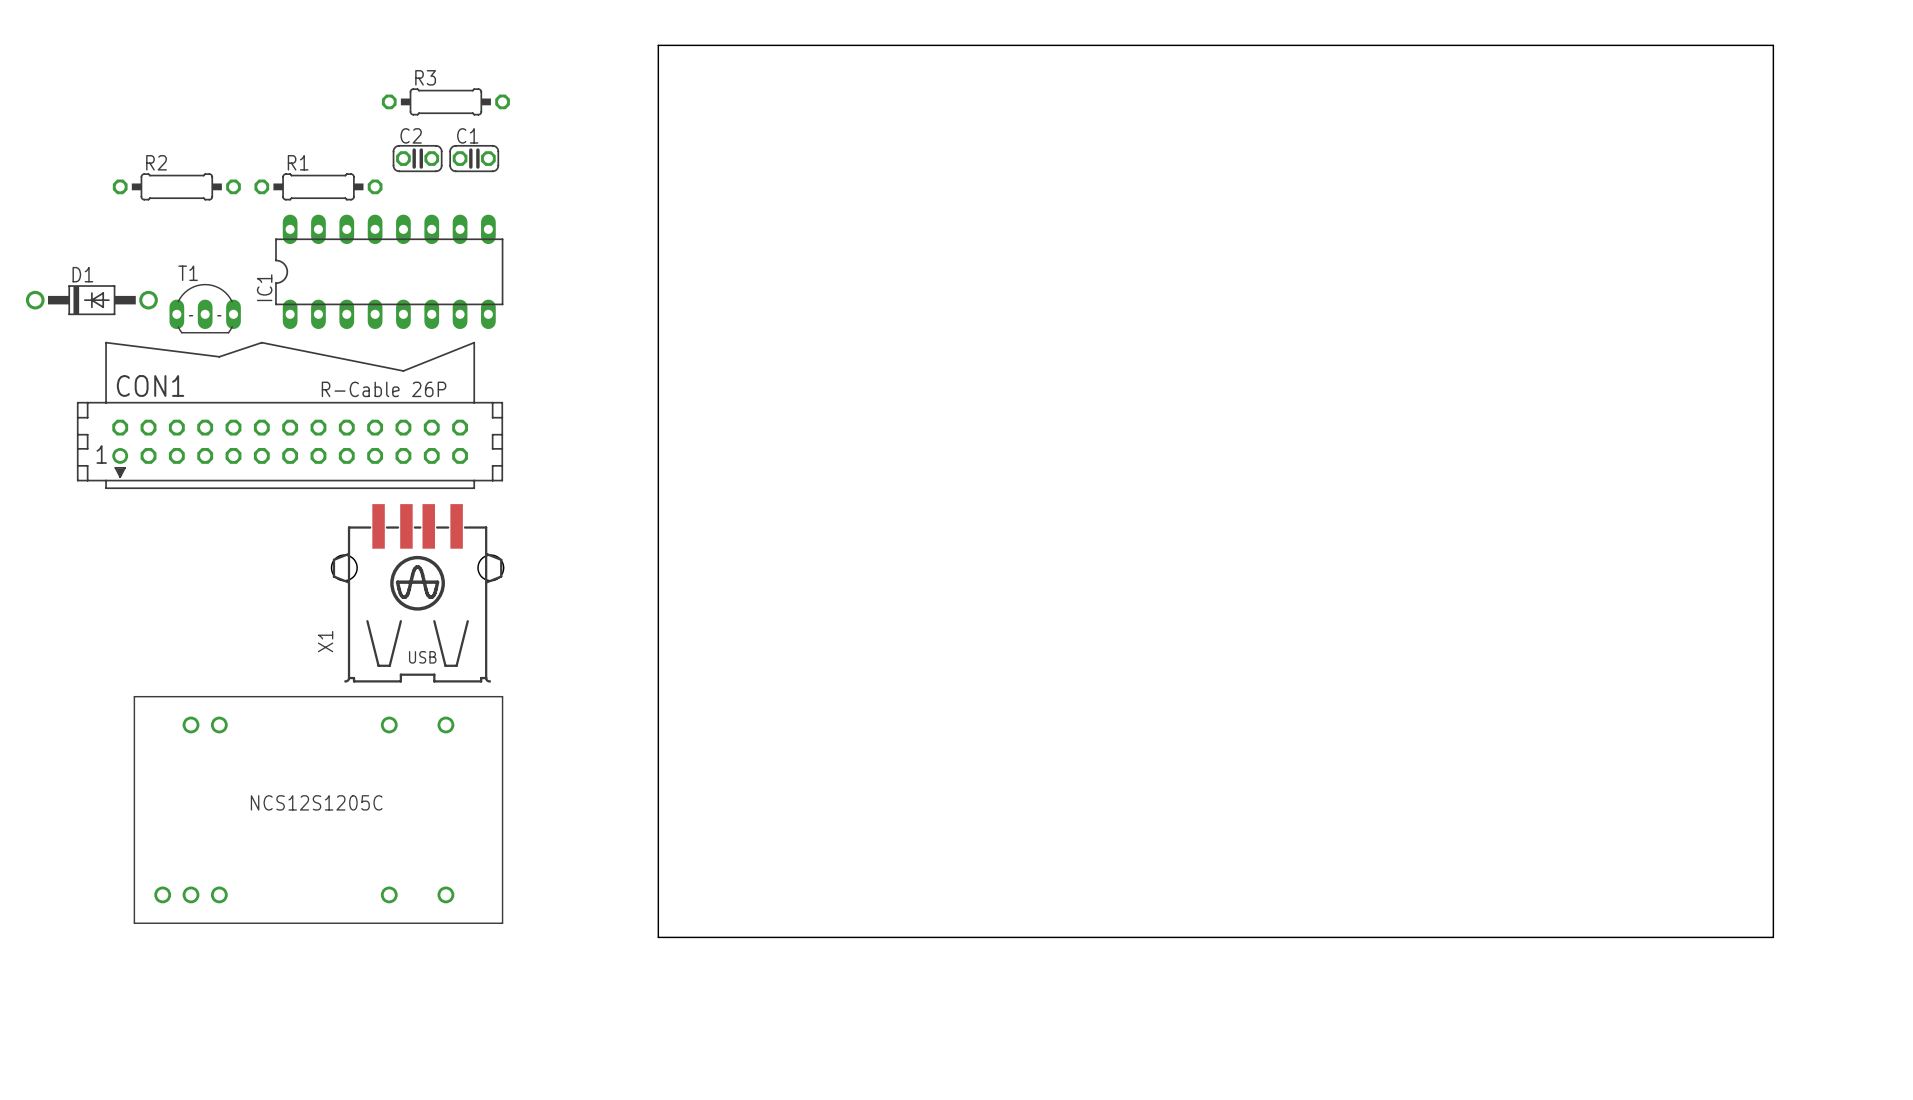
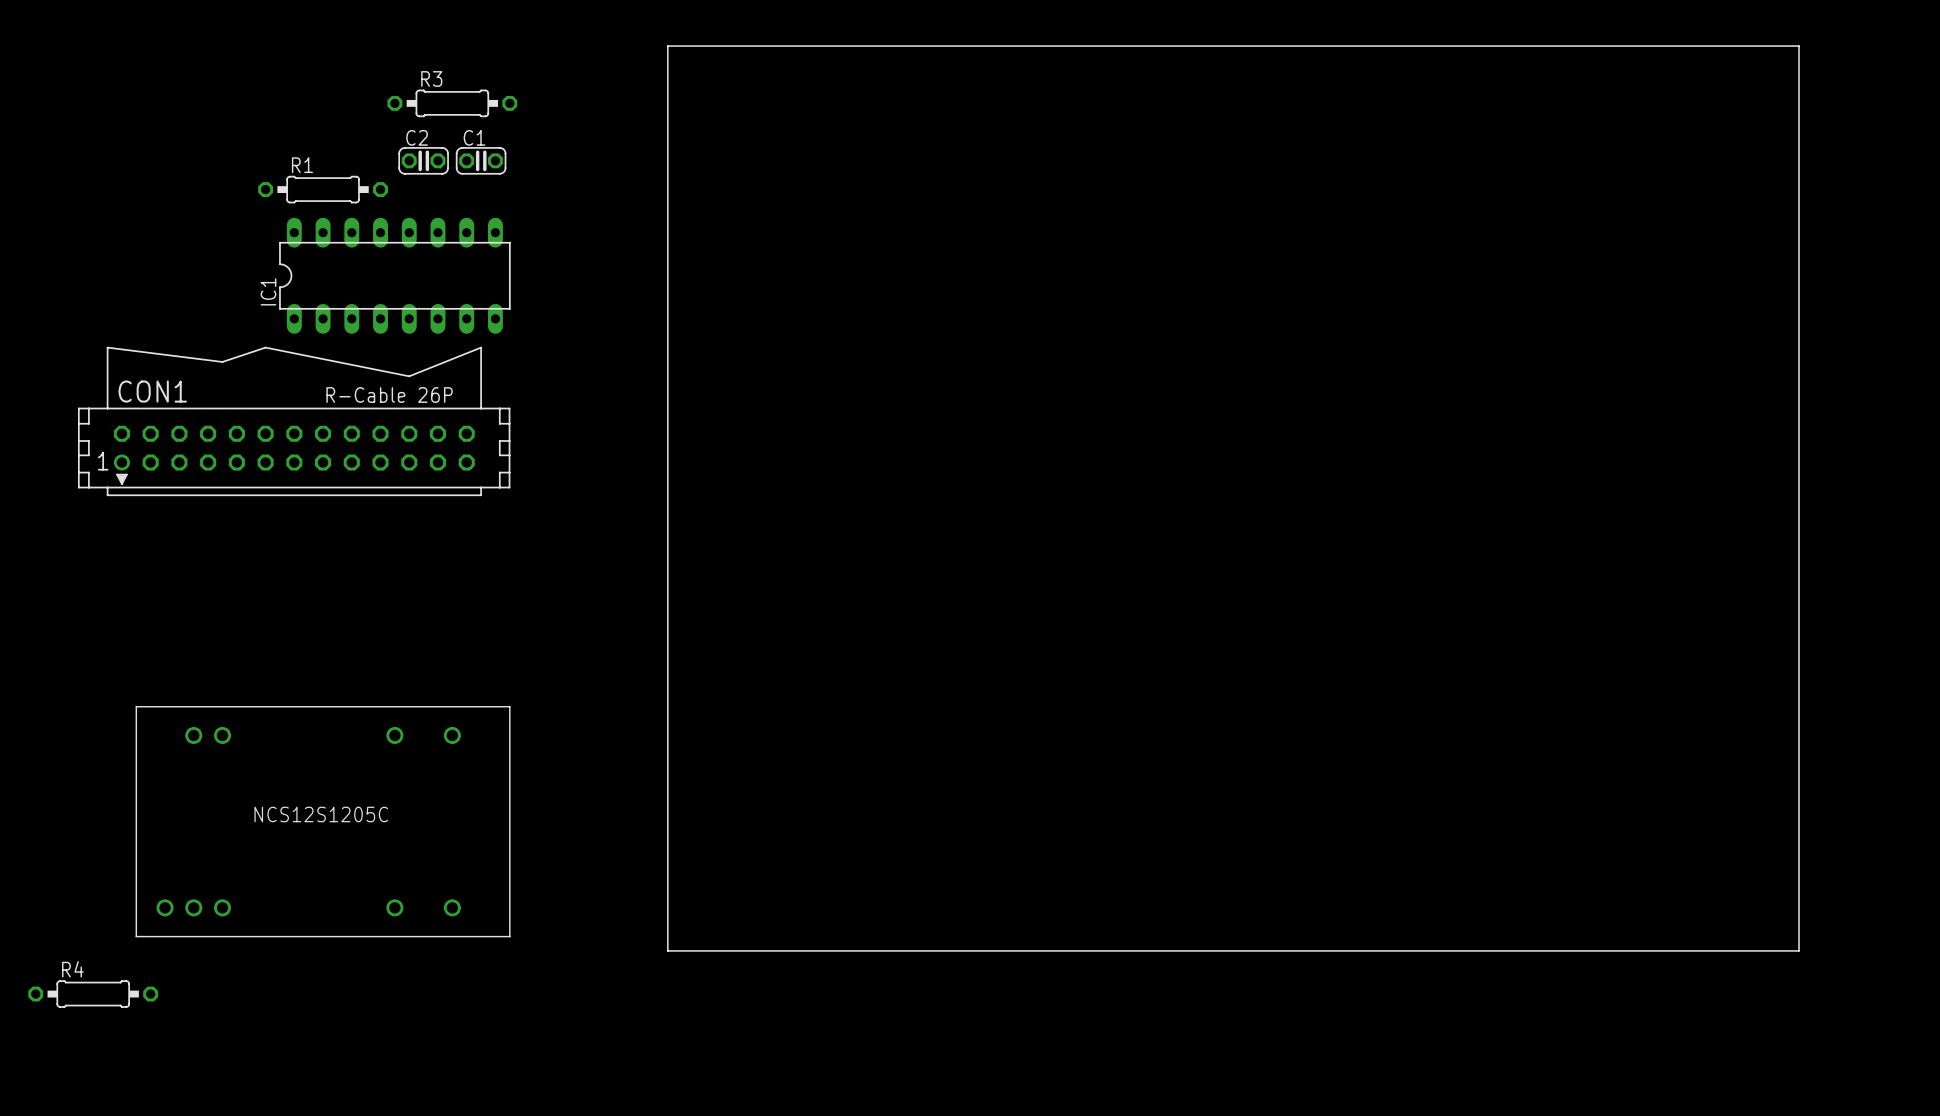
R2: (176, 186) -> none
D1: (91, 300) -> none
T1: (205, 308) -> none
X1: (417, 593) -> none
R4: none -> (93, 994)

